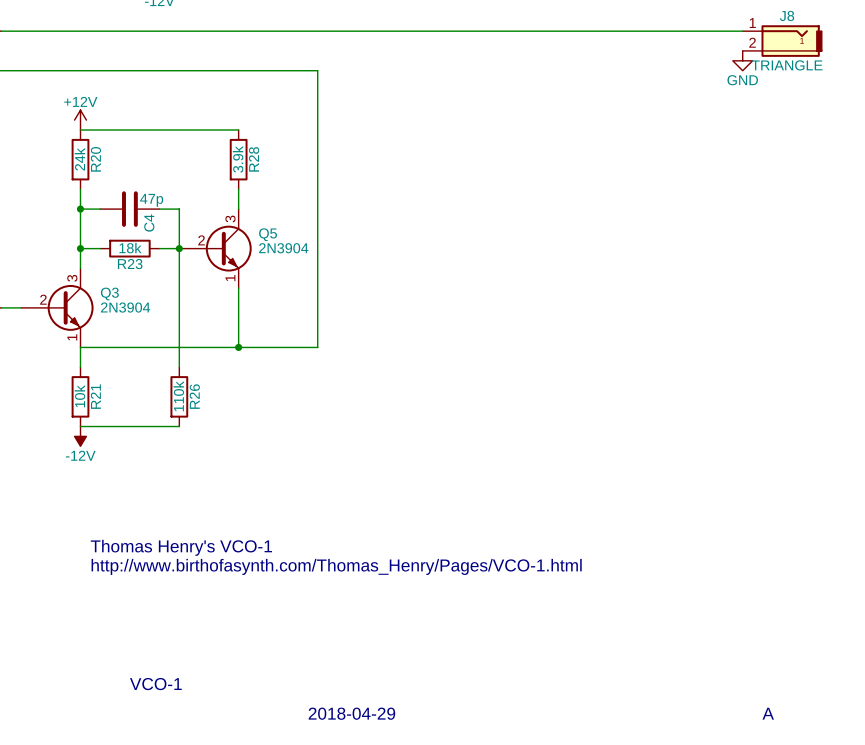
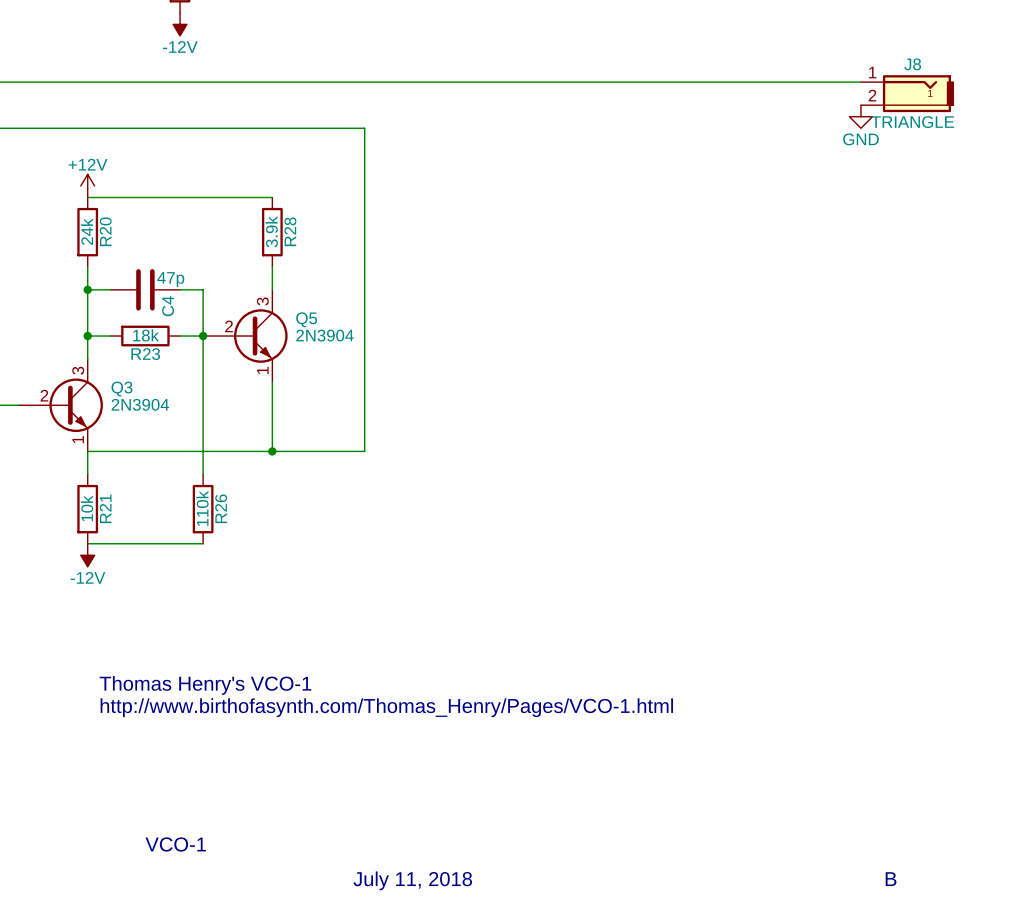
text: 2018-04-29 (351, 713) -> July 11, 2018 (412, 880)
text: A (768, 713) -> B (891, 879)

